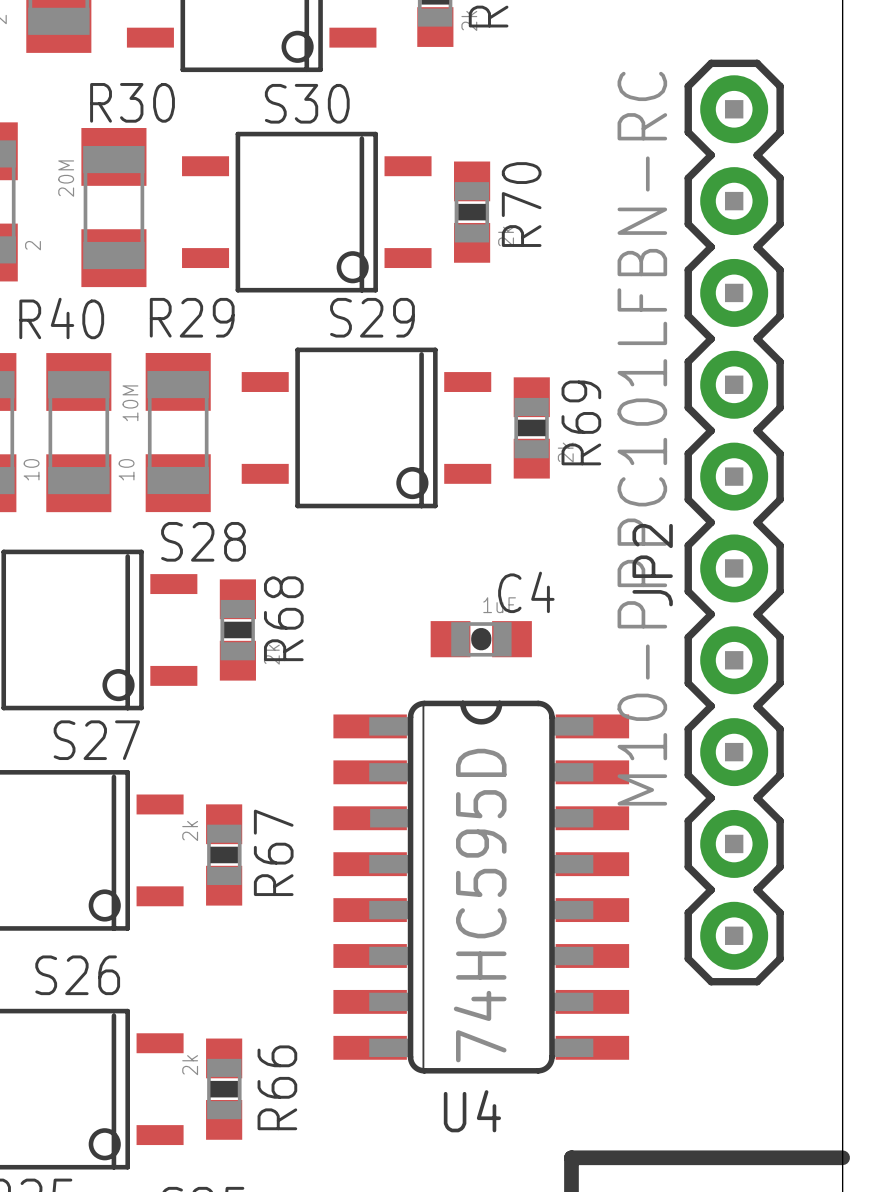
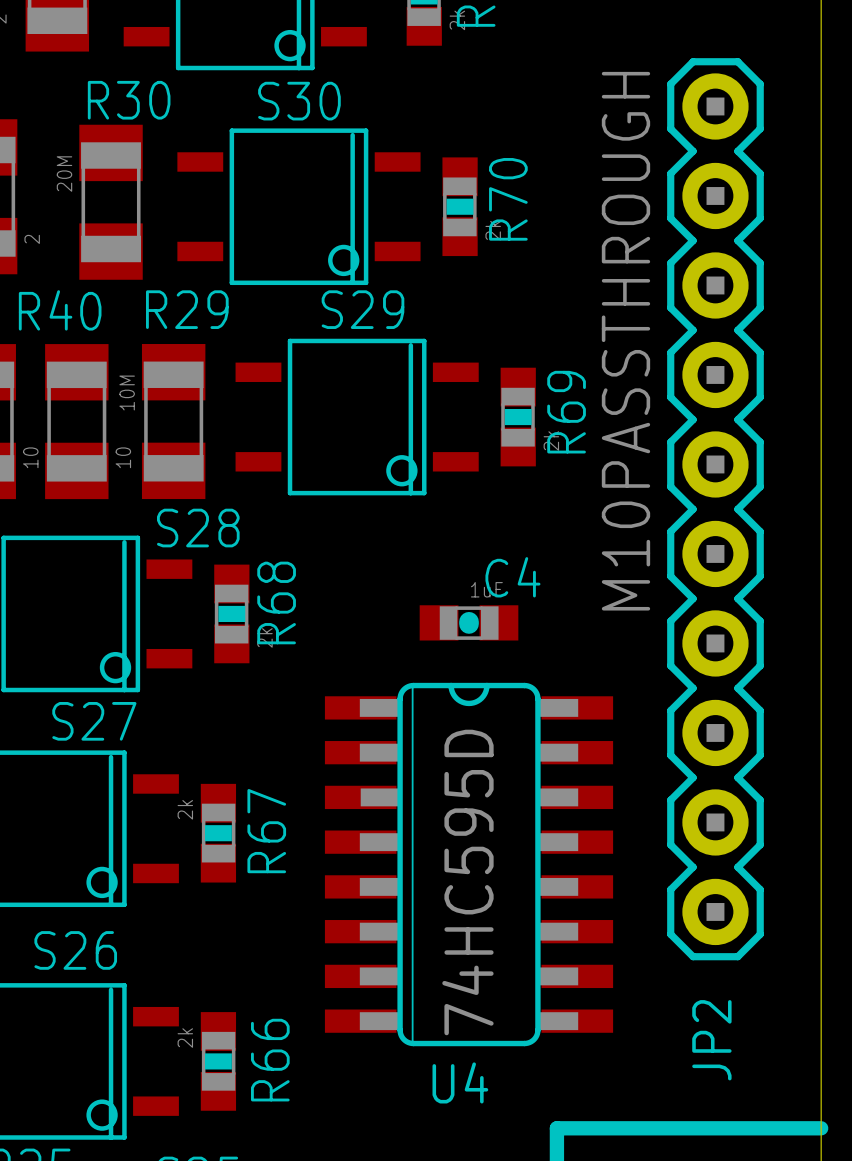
JP2 value: M10-PPPC101LFBN-RC (642, 438) -> M10PASSTHROUGH (625, 341)
JP2 name position: JP2 (652, 565) -> JP2 (711, 1040)

